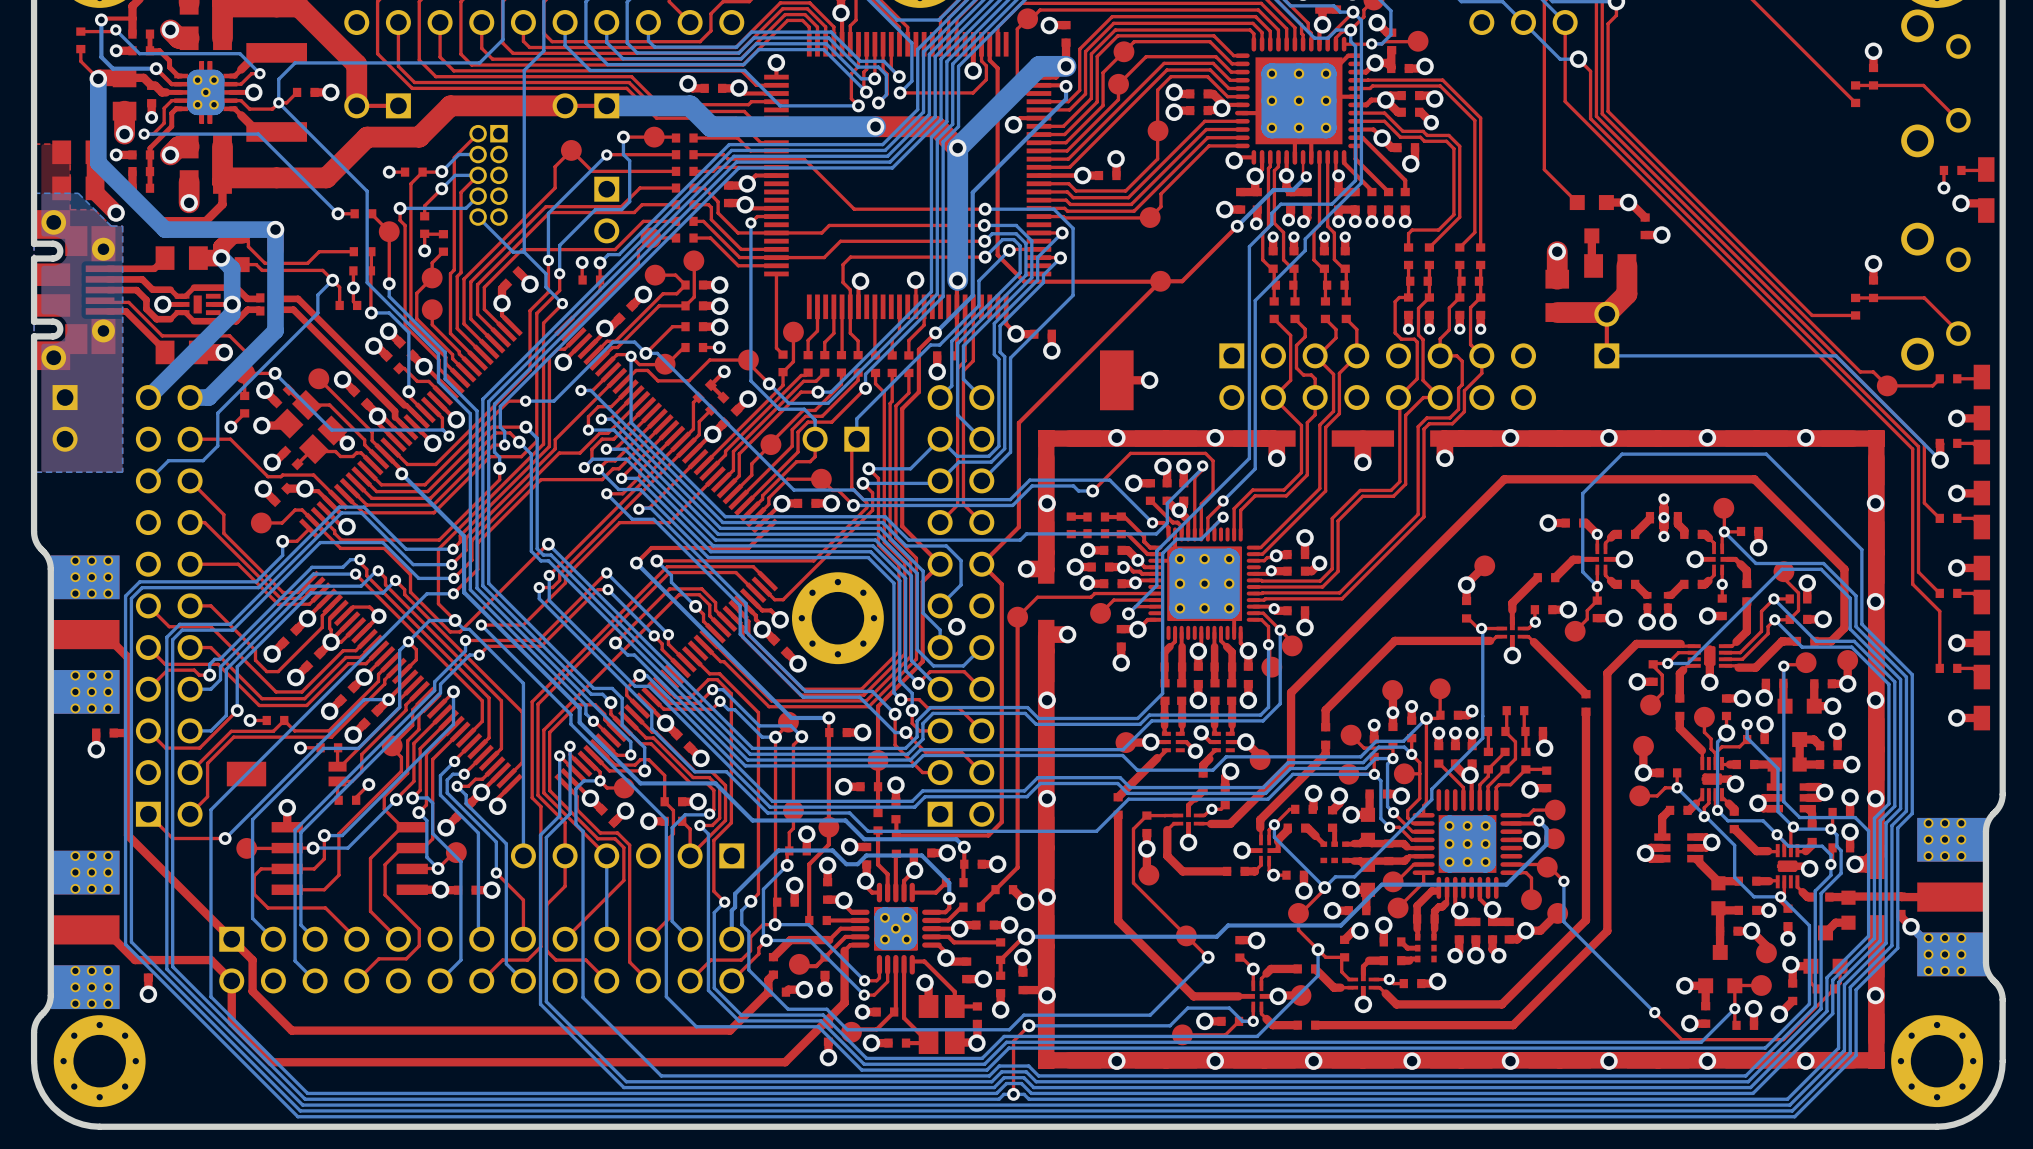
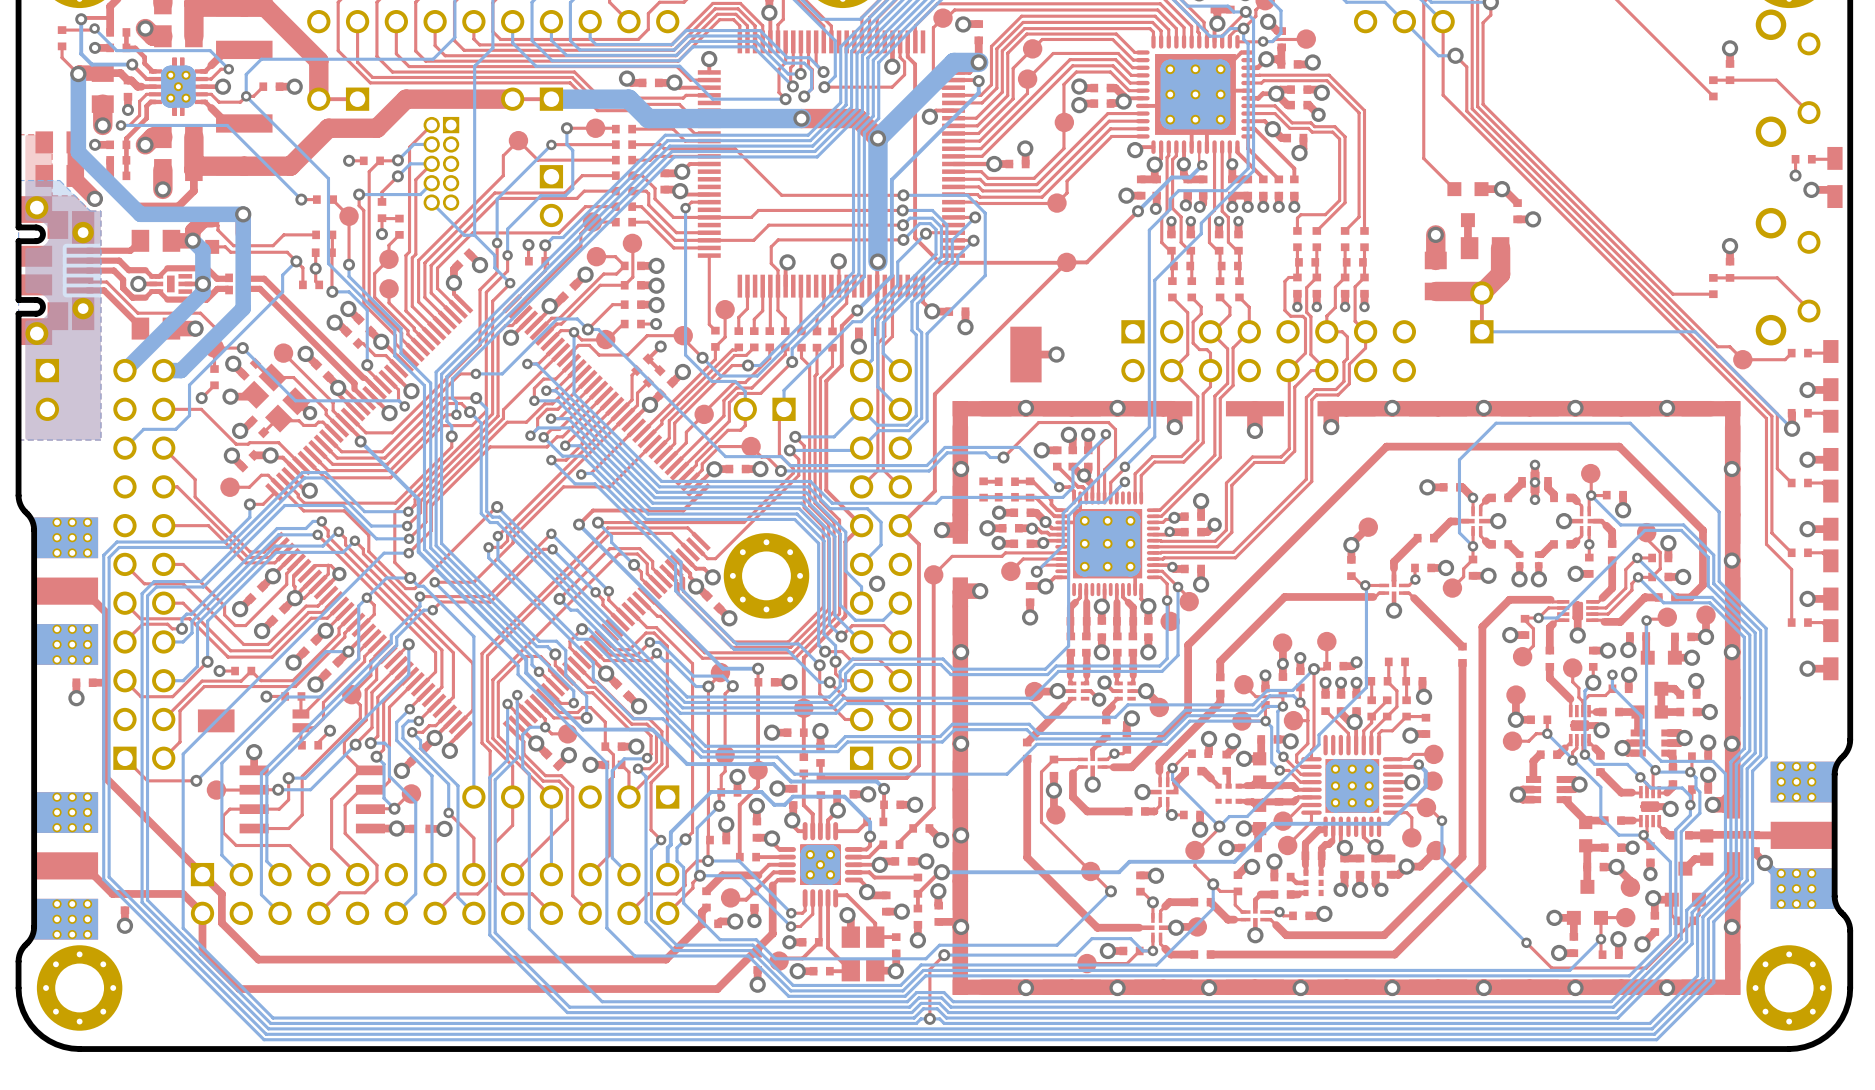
top track: none -> (328, 565) (328, 574) (317, 584)

